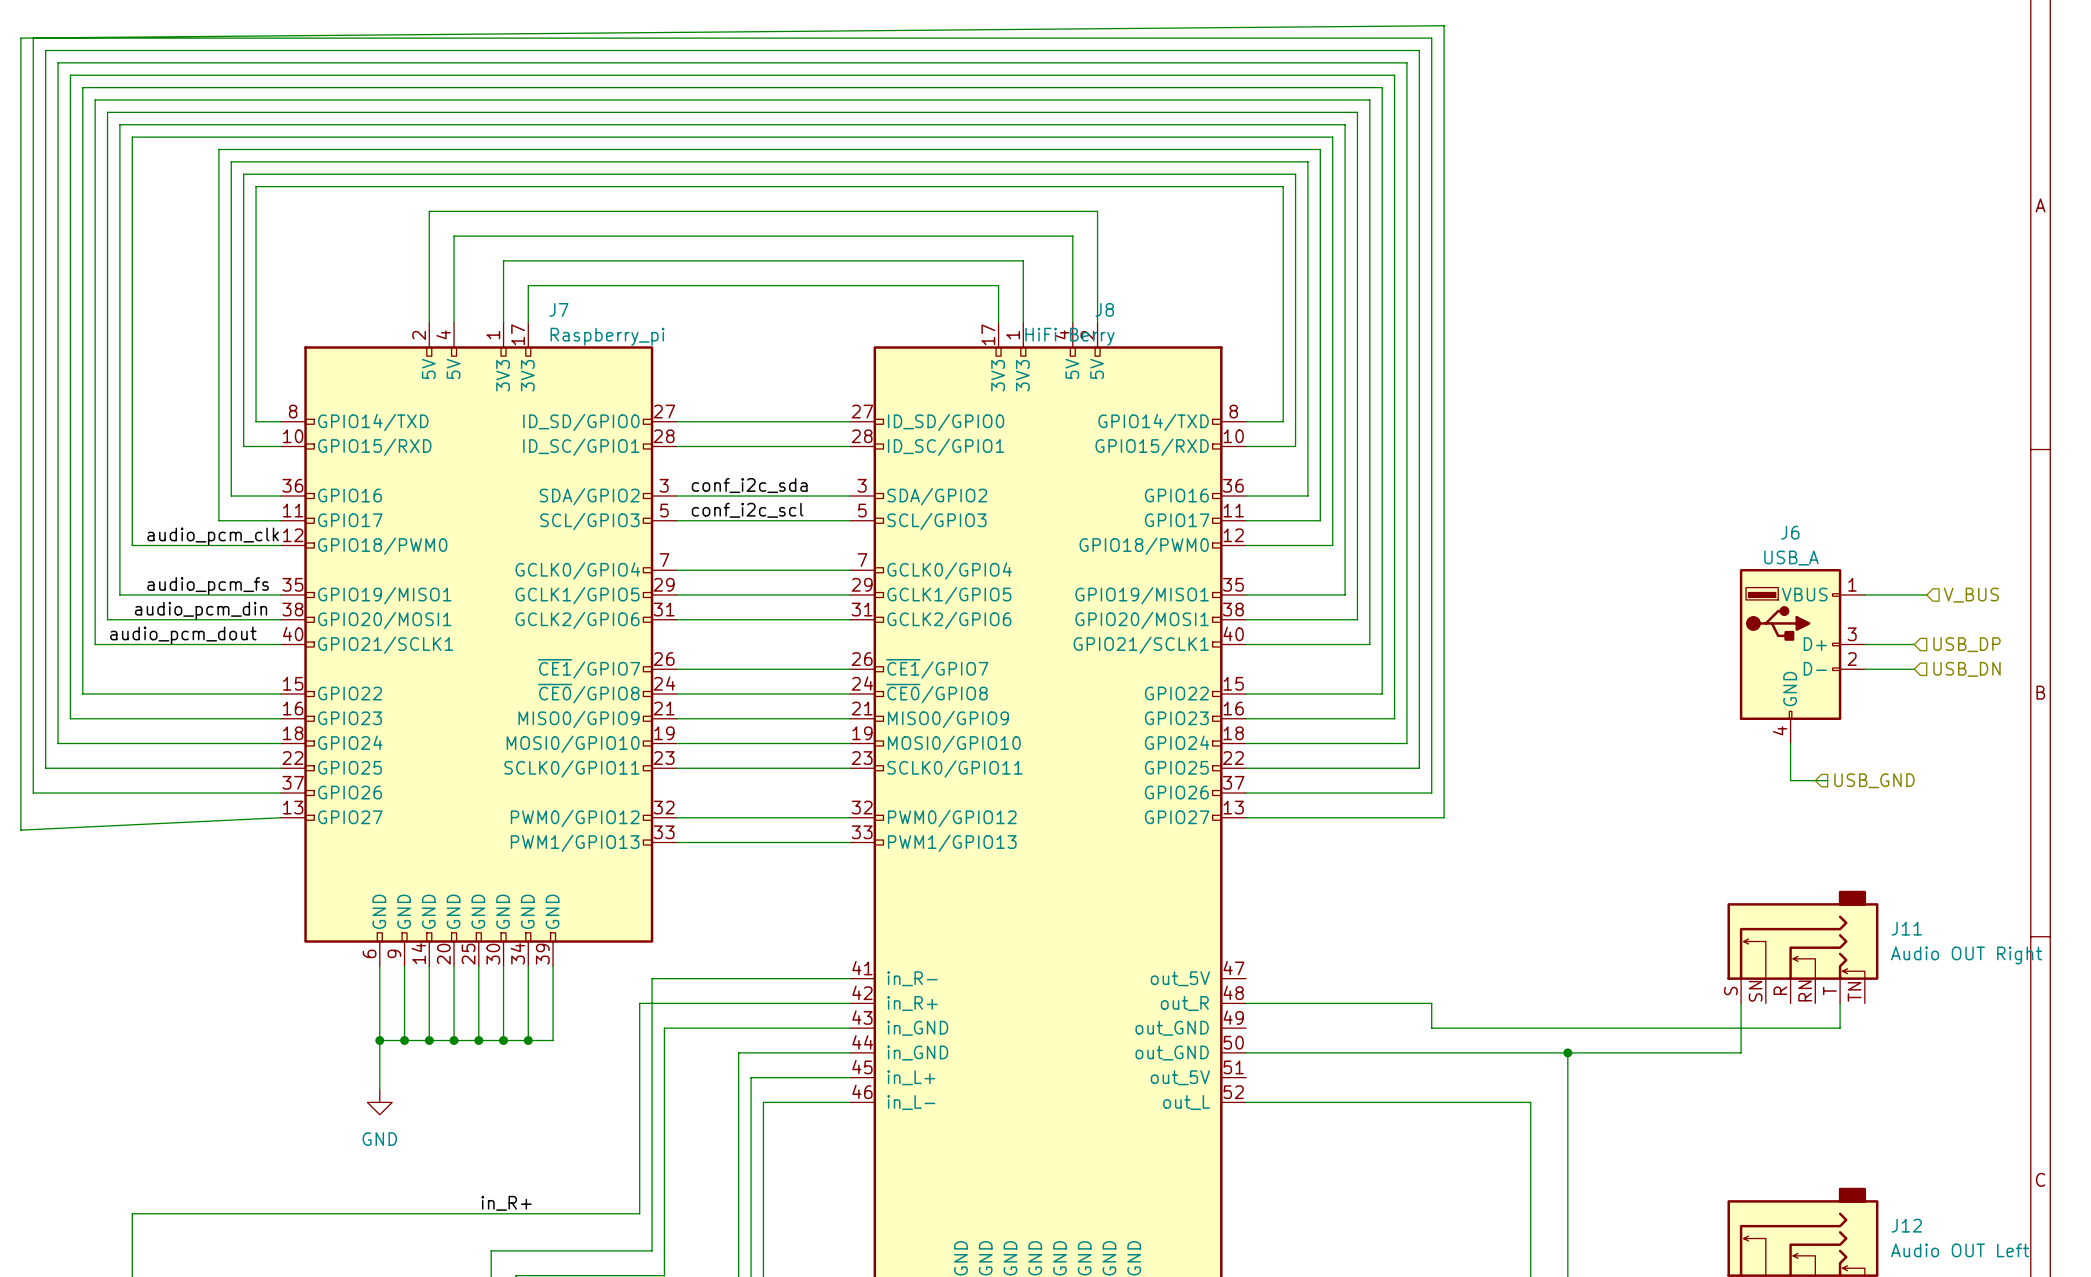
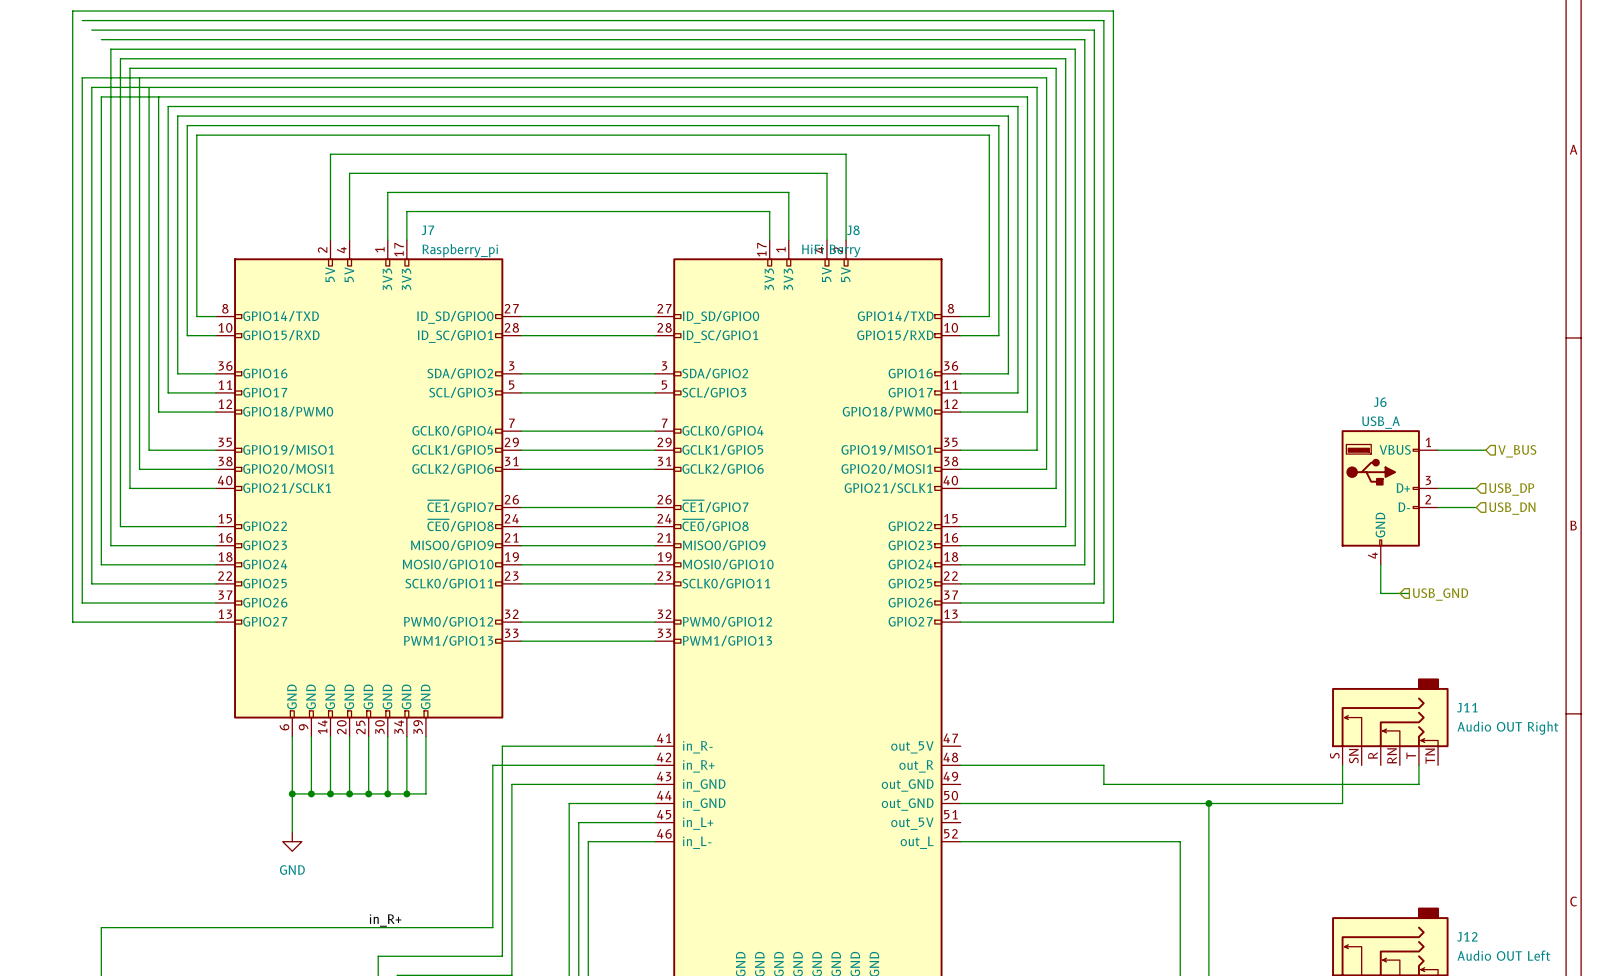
wire: (1444, 25) (20, 38) (20, 830) (280, 817) -> (1113, 11) (72, 11) (72, 68)
wire: (107, 38) (33, 38) (33, 793) (107, 793) -> none
wire: (119, 50) (45, 50) (45, 768) (119, 768) -> none
wire: (132, 62) (58, 62) (58, 743) (132, 743) -> none
wire: (144, 75) (70, 75) (70, 718) (144, 718) -> (110, 49) (110, 545)
wire: (157, 87) (82, 87) (82, 694) (157, 694) -> (120, 58) (120, 526)
wire: (95, 99) (169, 99) -> (129, 488) (129, 68)
wire: none -> (139, 77) (139, 469)
wire: none -> (149, 87) (149, 450)
wire: none -> (158, 96) (158, 412)
label: conf_i2c_sda (749, 485) -> none
label: conf_i2c_scl (747, 510) -> none
label: audio_pcm_clk (213, 536) -> none
wire: (132, 545) (206, 545) -> (101, 412) (101, 564)
label: audio_pcm_fs (208, 586) -> none
wire: (119, 595) (194, 595) -> (91, 450) (91, 583)
label: audio_pcm_din (201, 610) -> none
wire: (107, 619) (181, 619) -> (82, 469) (82, 602)
label: audio_pcm_dout (183, 635) -> none
wire: (95, 644) (169, 644) -> (72, 488) (72, 622) (215, 622)

